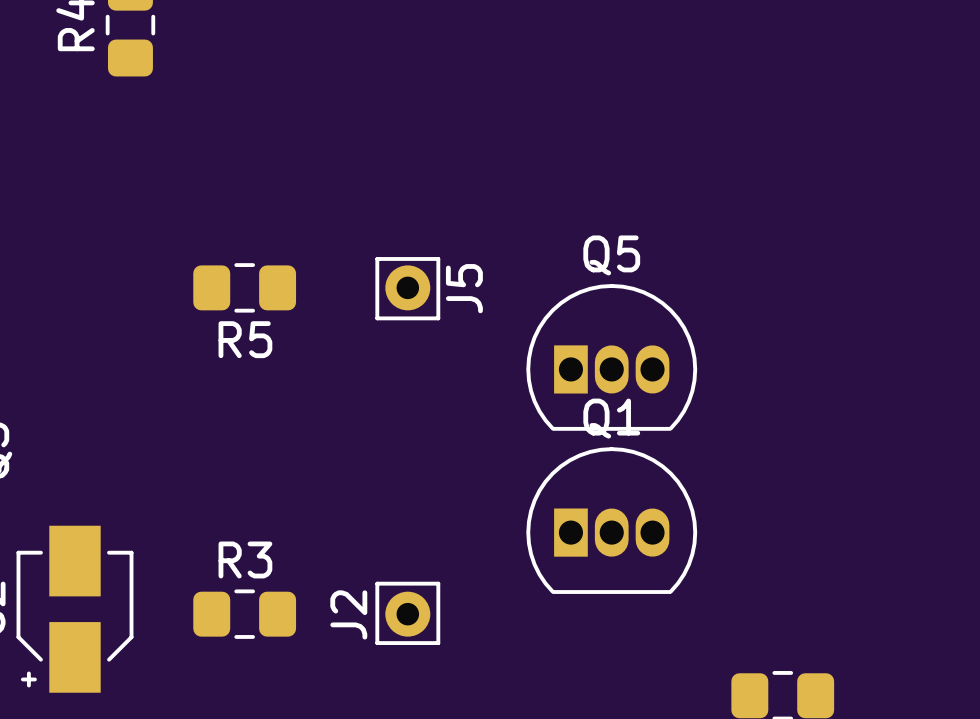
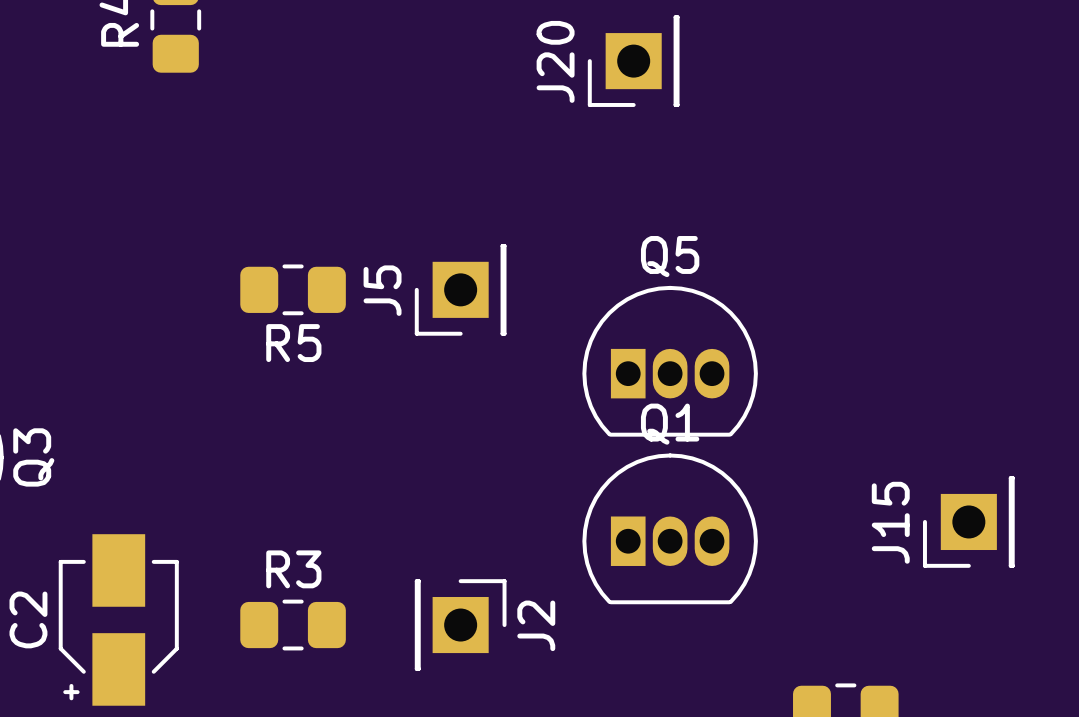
J20: none -> (633, 61)
J5 footprint: [375, 257, 441, 321] -> [414, 244, 507, 336]
J5 name position: J5 (464, 288) -> J5 (382, 290)
J15: none -> (968, 521)
J2 footprint: [375, 581, 441, 645] -> [414, 579, 507, 671]
J2 name position: J2 (348, 614) -> J2 (536, 625)

